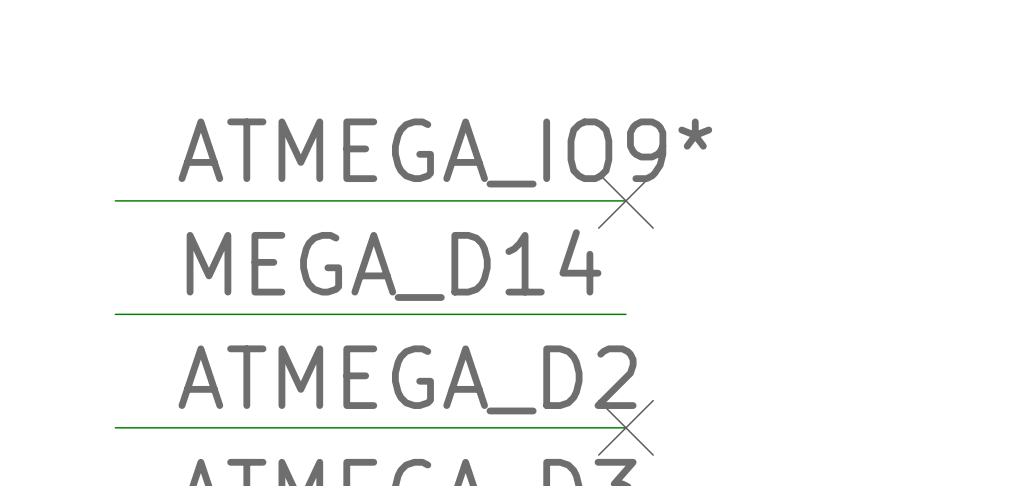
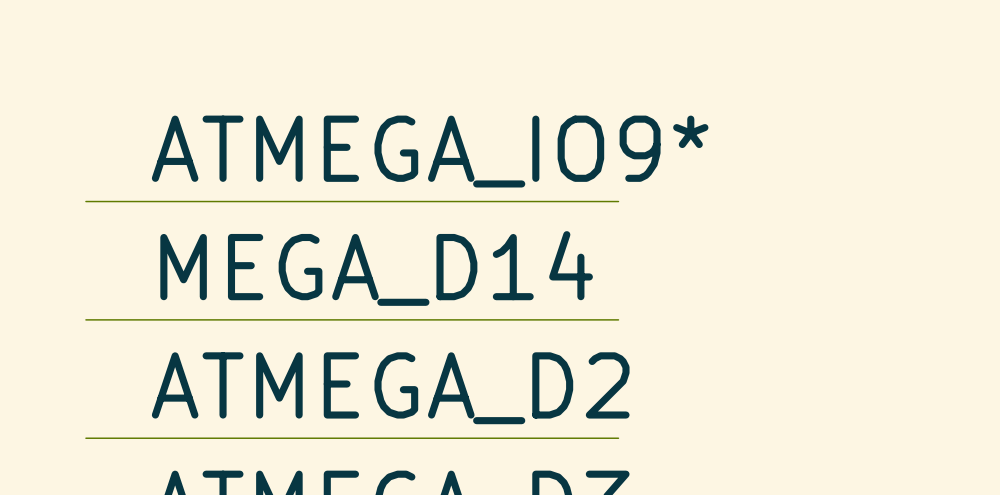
no-connect mark: (625, 200) -> none
no-connect mark: (625, 427) -> none

